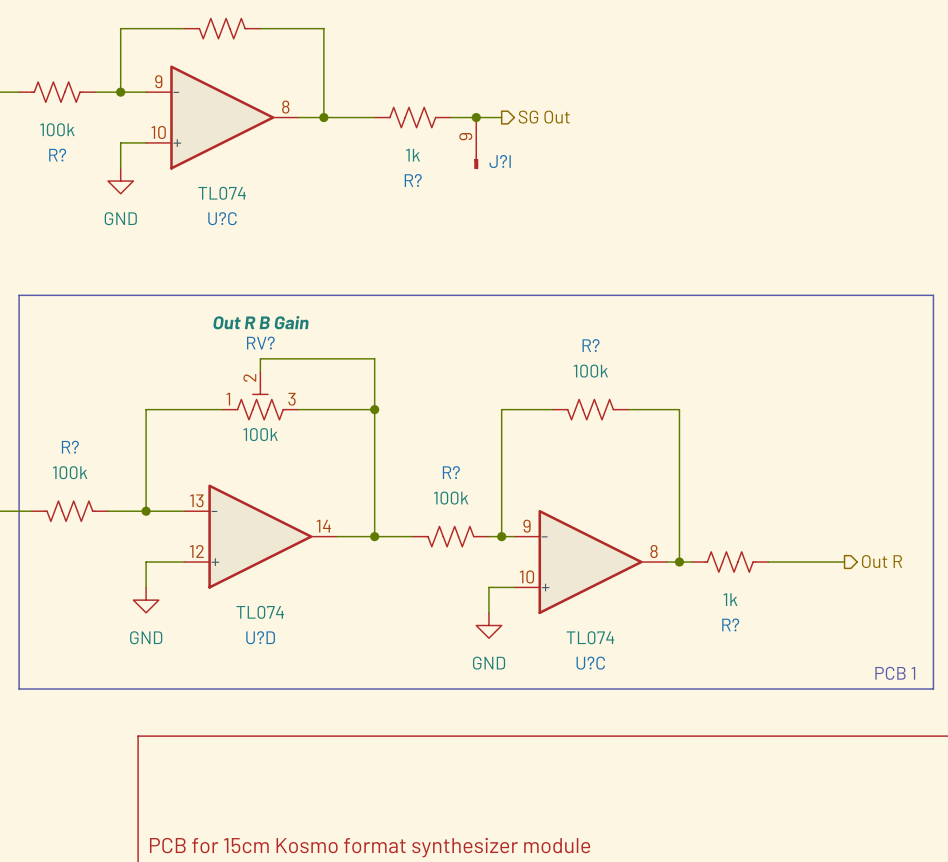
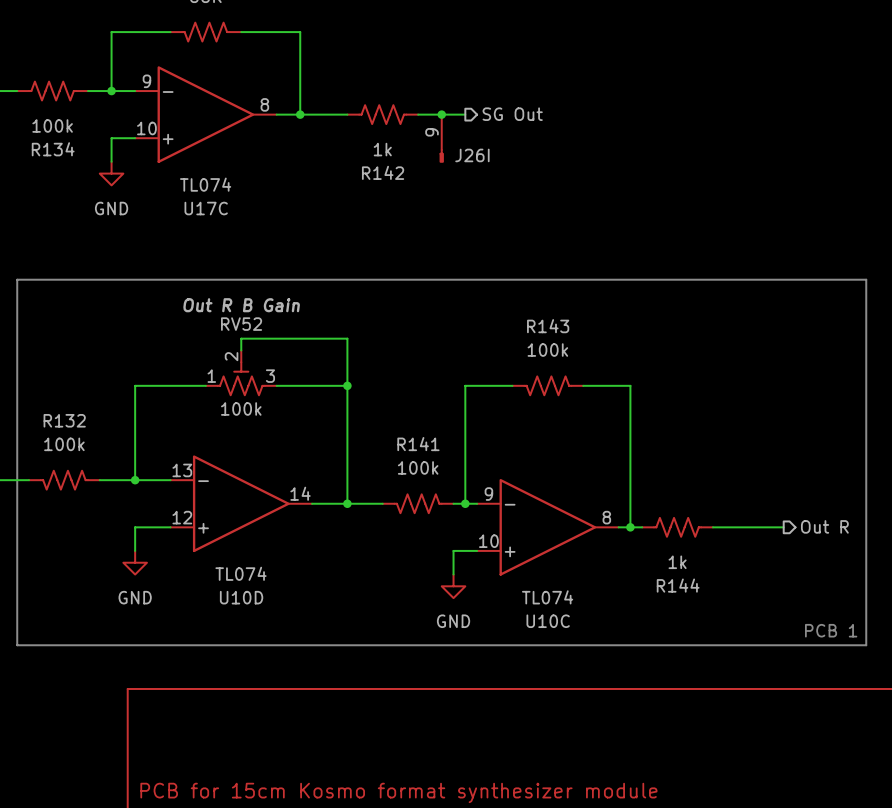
R? name: R? (57, 155) -> R134 (53, 149)
J?I name: J?I (500, 161) -> J26I (472, 155)
R? name: R? (413, 180) -> R142 (383, 172)
U?C name: U?C (222, 218) -> U17C (206, 208)
RV? name: RV? (260, 343) -> RV52 (241, 324)
R? name: R? (591, 345) -> R143 (548, 326)
R? name: R? (70, 447) -> R132 (64, 420)
R? name: R? (451, 472) -> R141 (418, 444)
R? name: R? (730, 624) -> R144 (678, 585)
U?D name: U?D (260, 637) -> U10D (241, 597)
U?C name: U?C (590, 663) -> U10C (548, 621)

